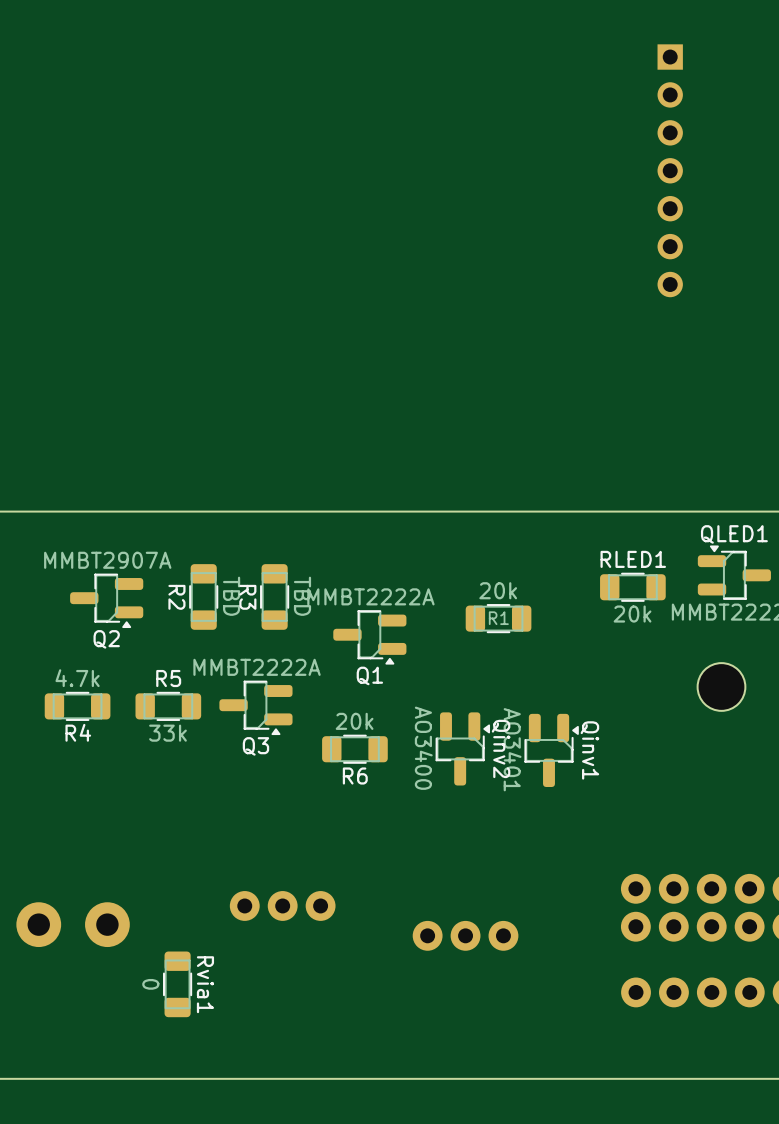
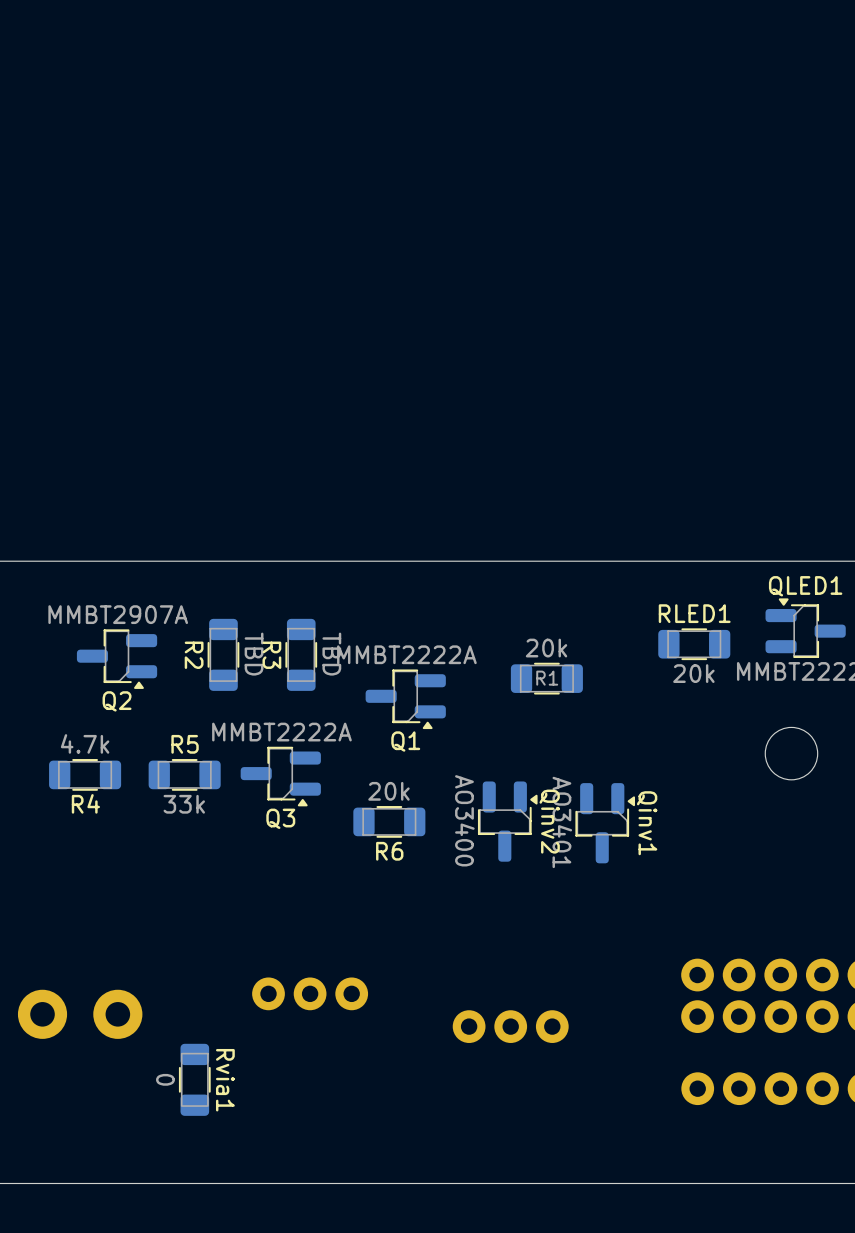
part: (670, 170) -> none

